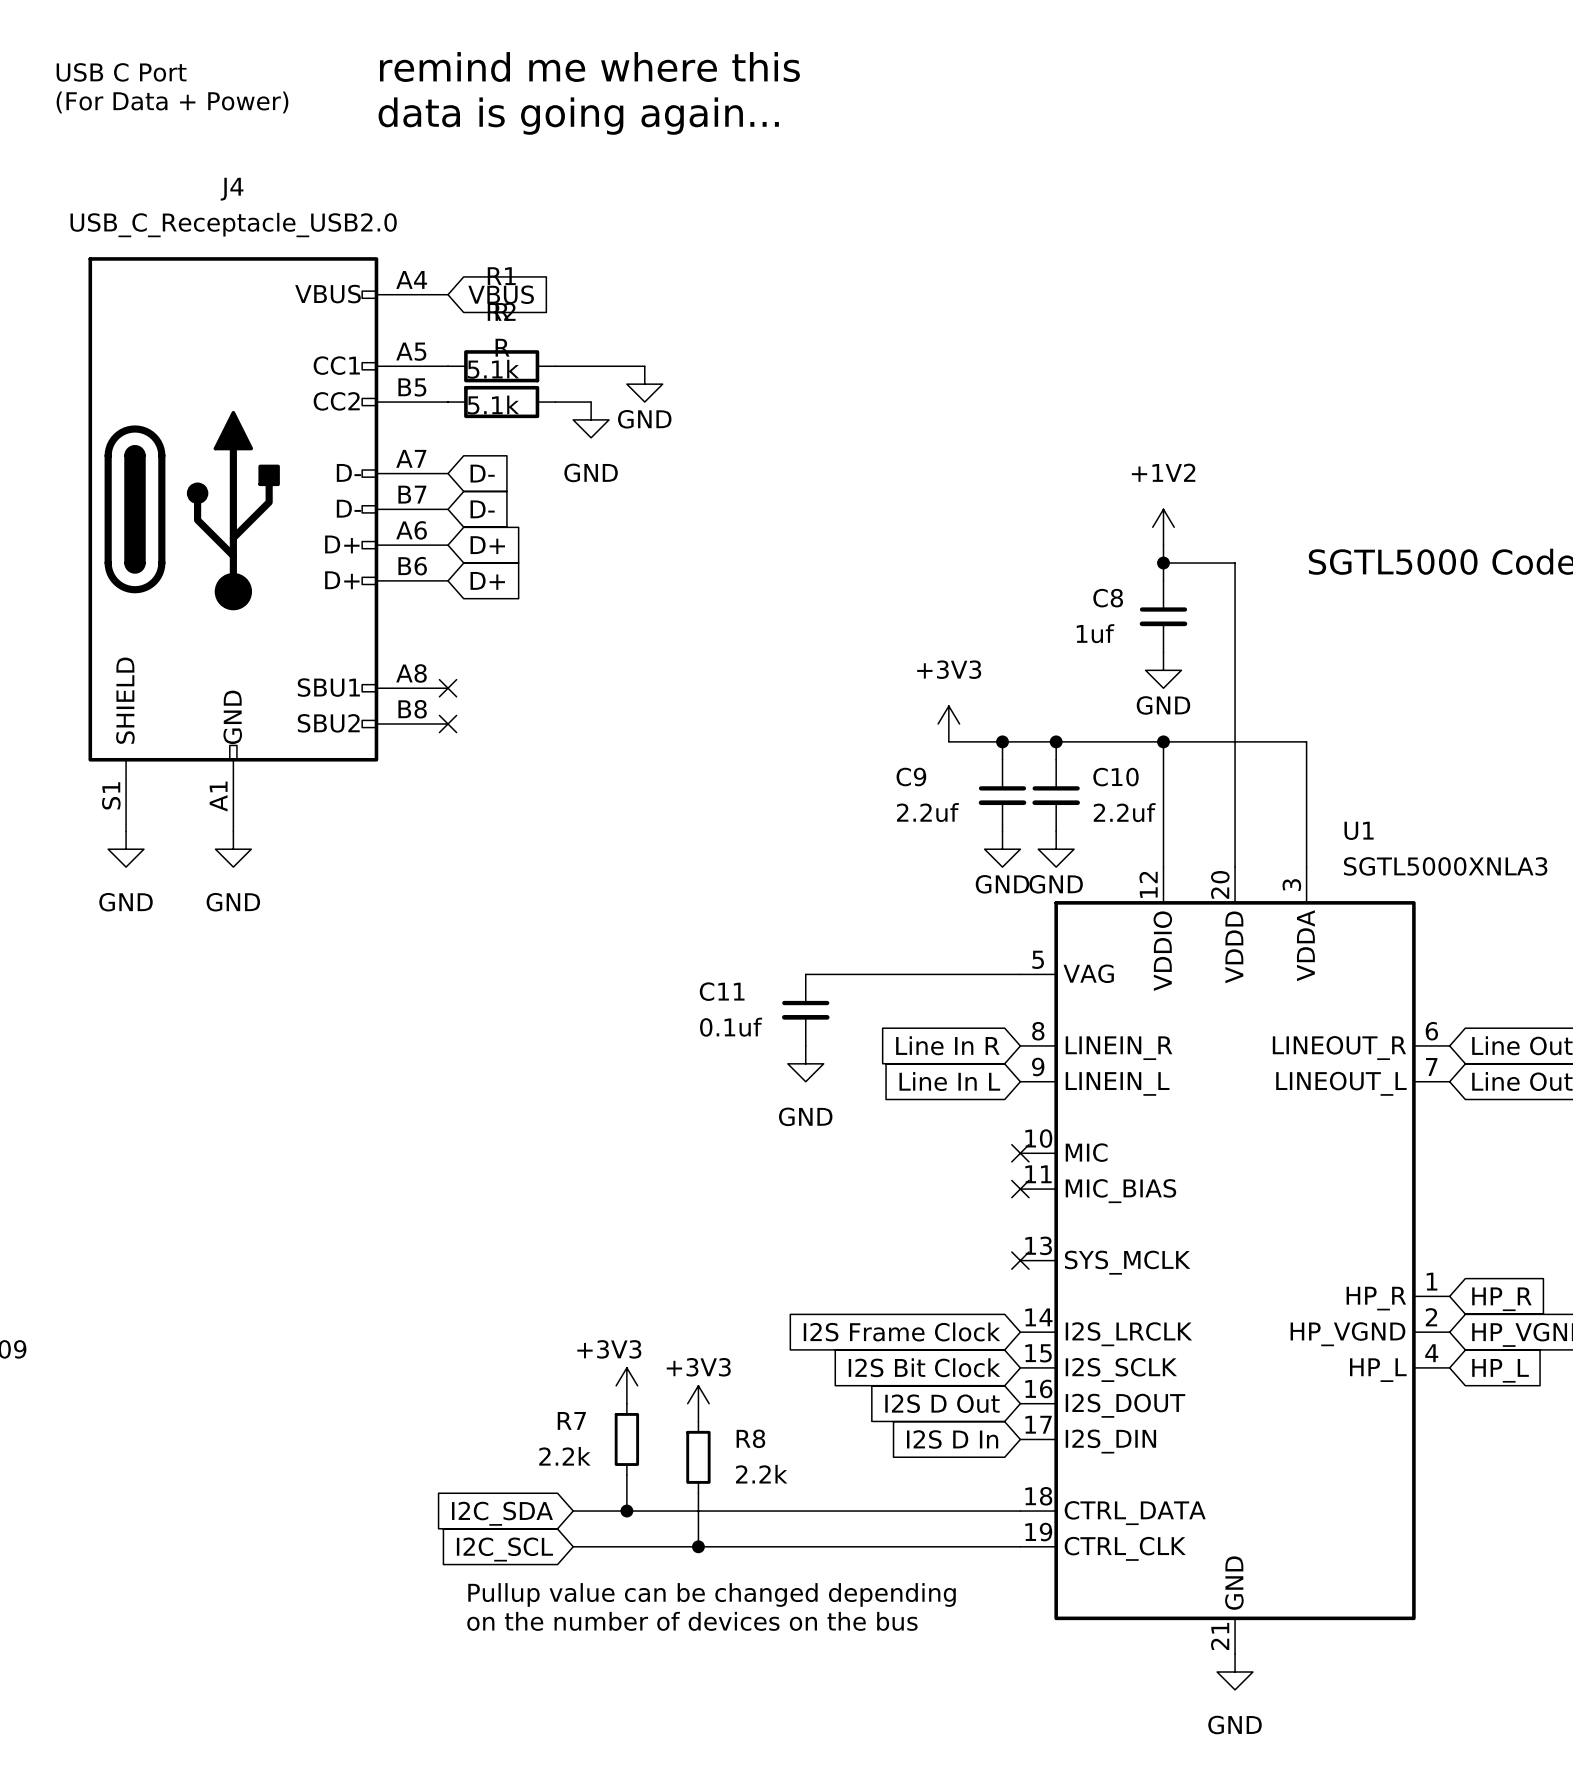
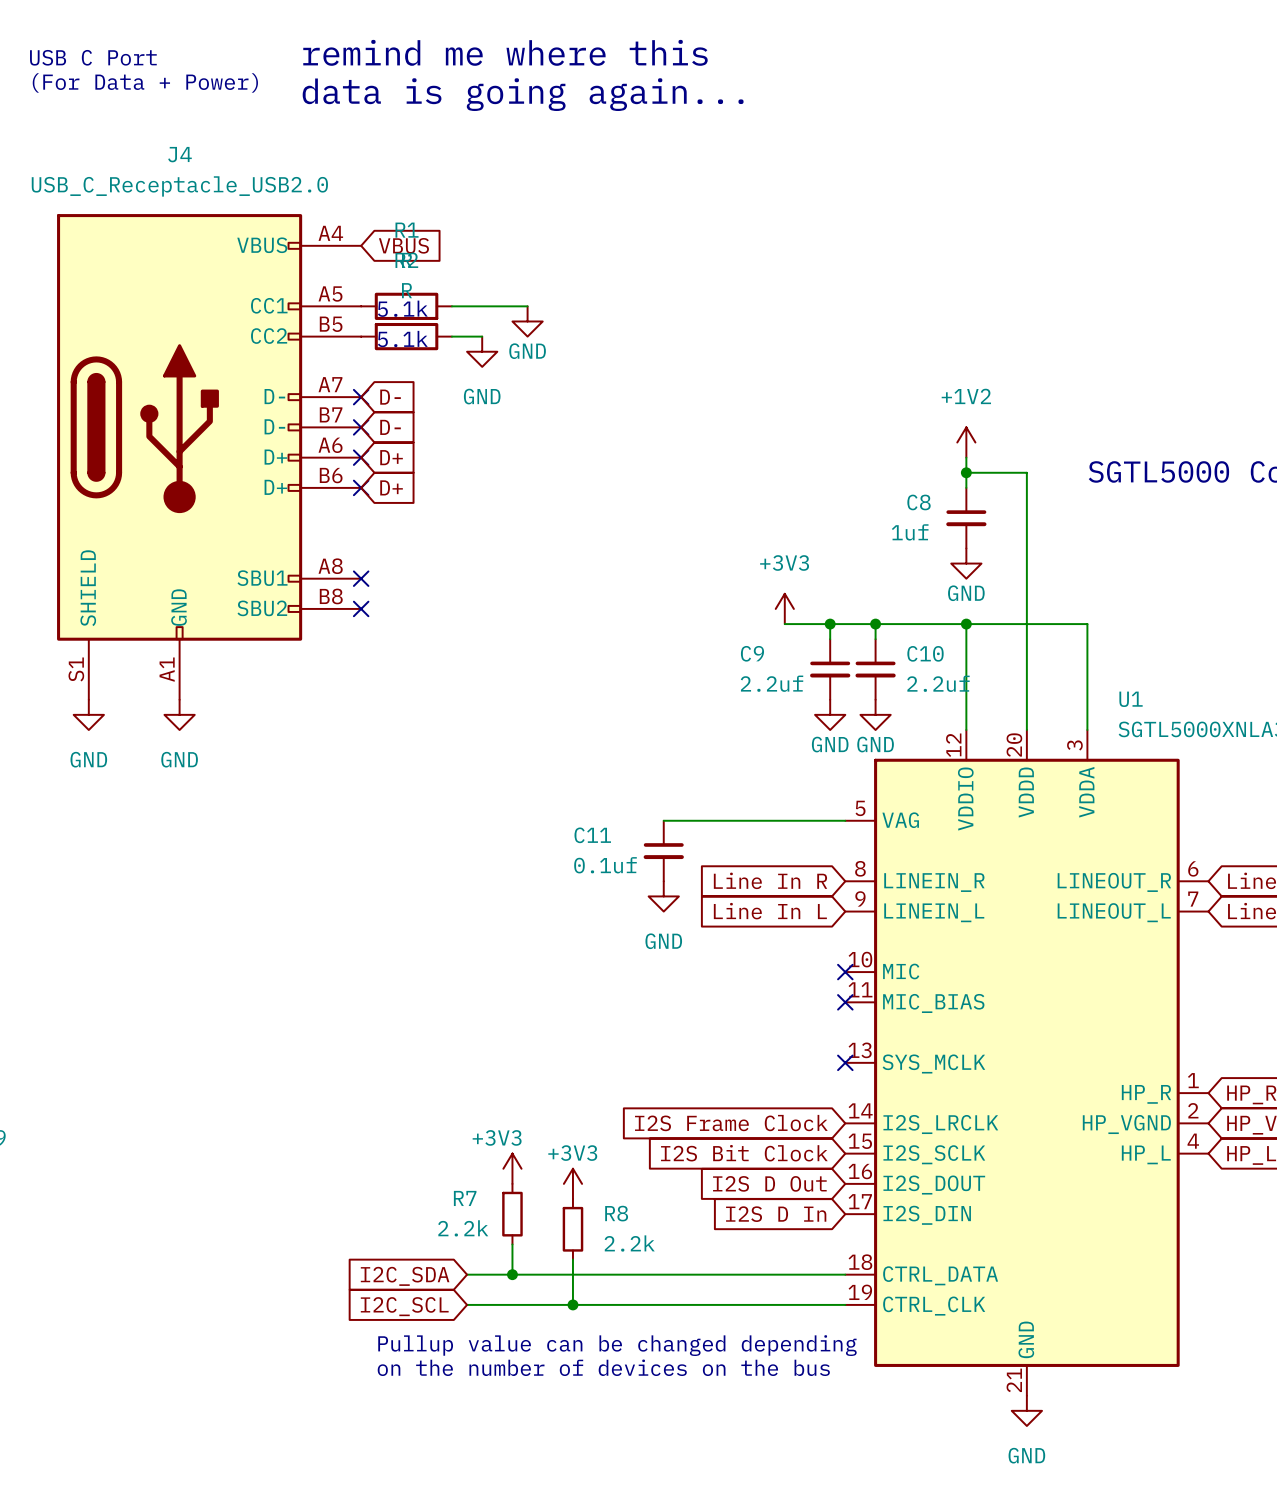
no-connect mark: none -> (361, 397)
no-connect mark: none -> (361, 427)
no-connect mark: none -> (361, 457)
no-connect mark: none -> (361, 487)

